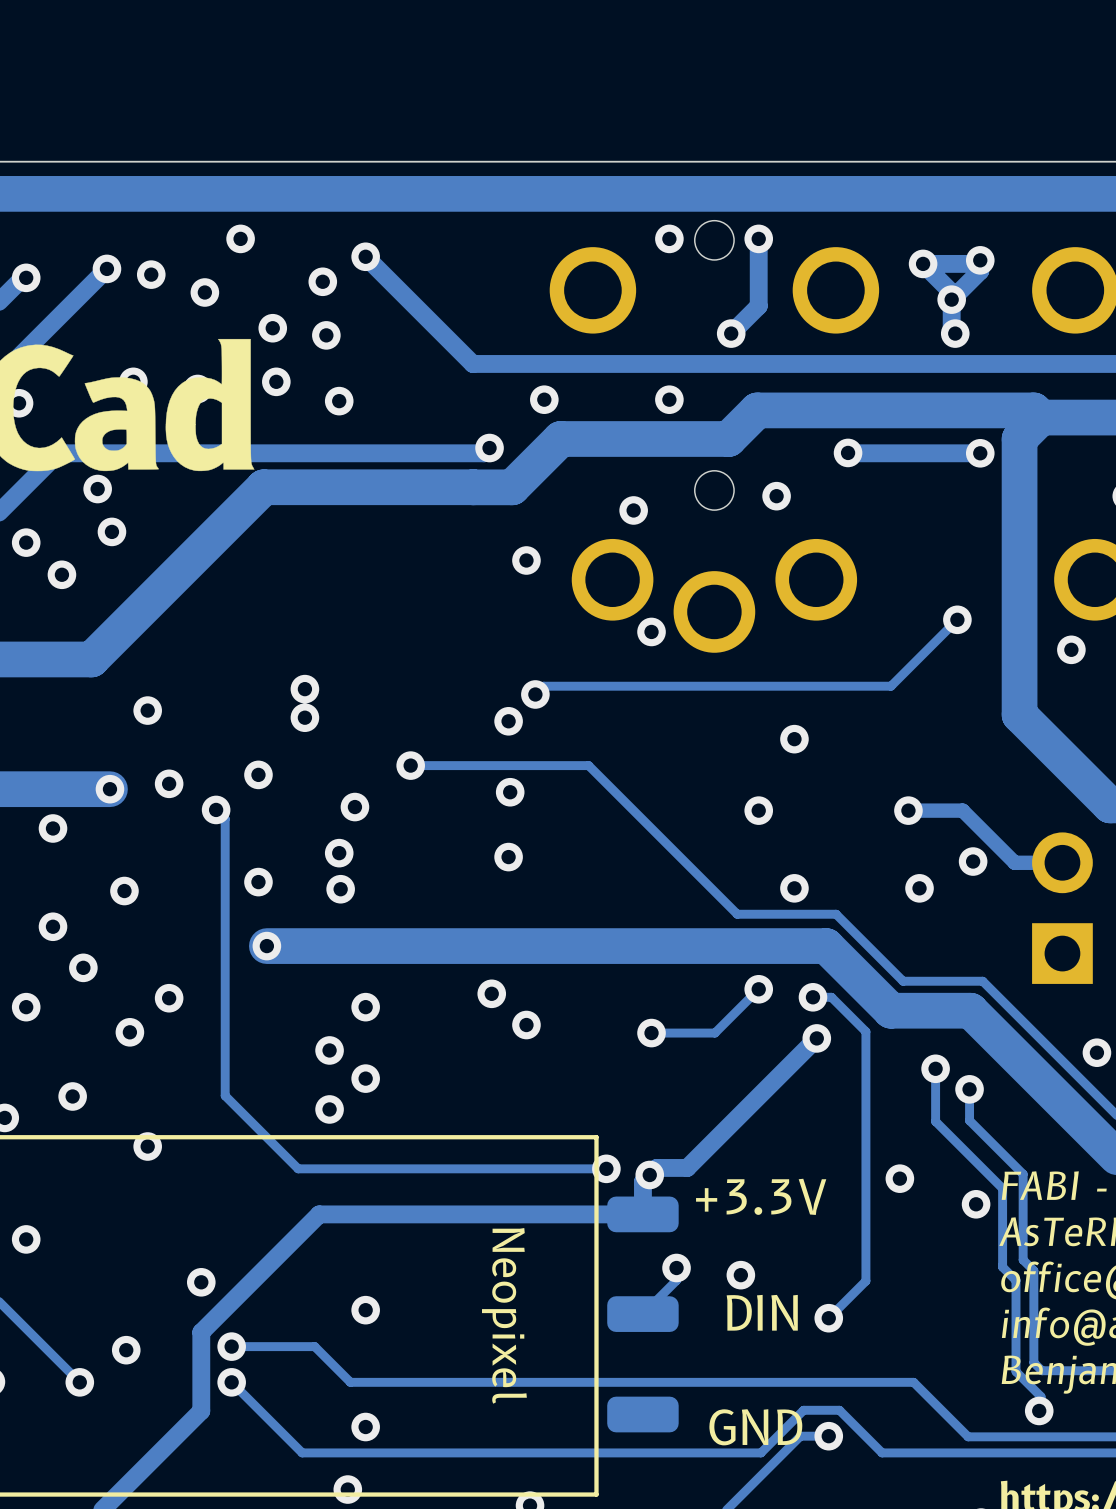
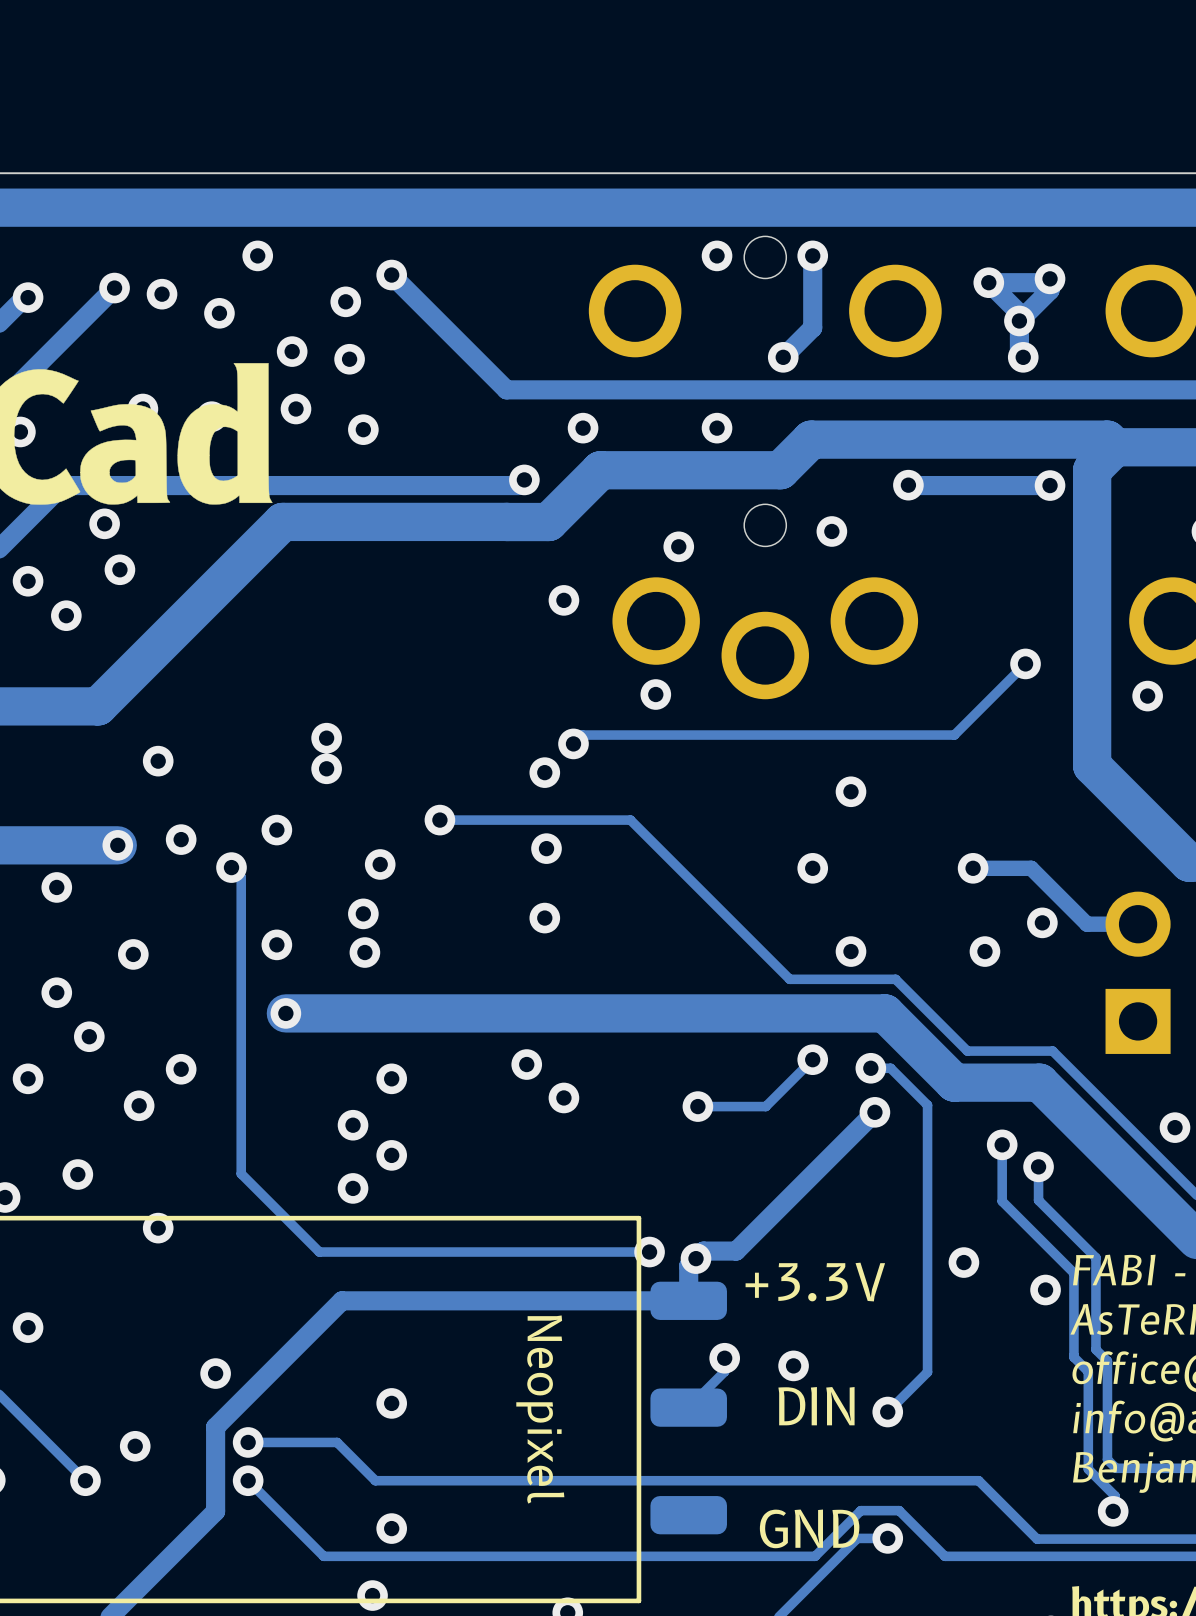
via position: (651, 631) -> (655, 694)

